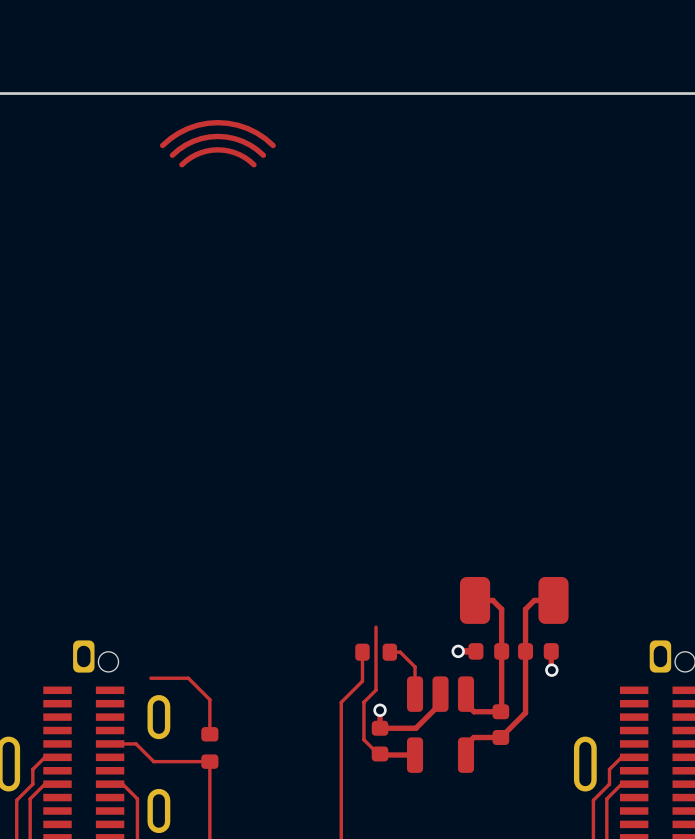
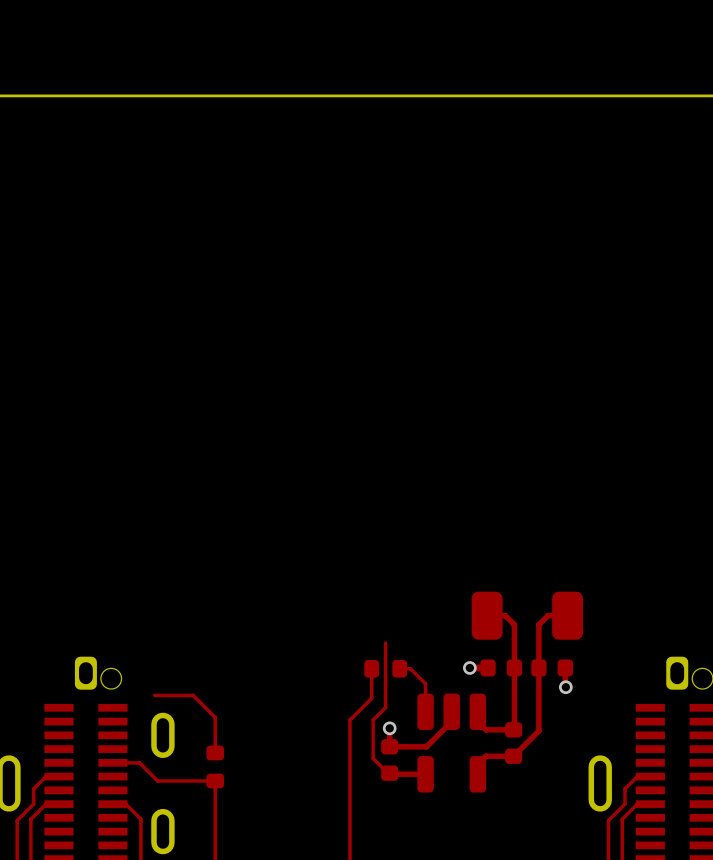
top track: (273, 145) (247, 128) (217, 122) (187, 128) (162, 145) -> none
top track: (263, 155) (242, 141) (217, 136) (193, 141) (172, 155) -> none
top track: (253, 164) (240, 154) (217, 149) (195, 154) (181, 164) -> none

